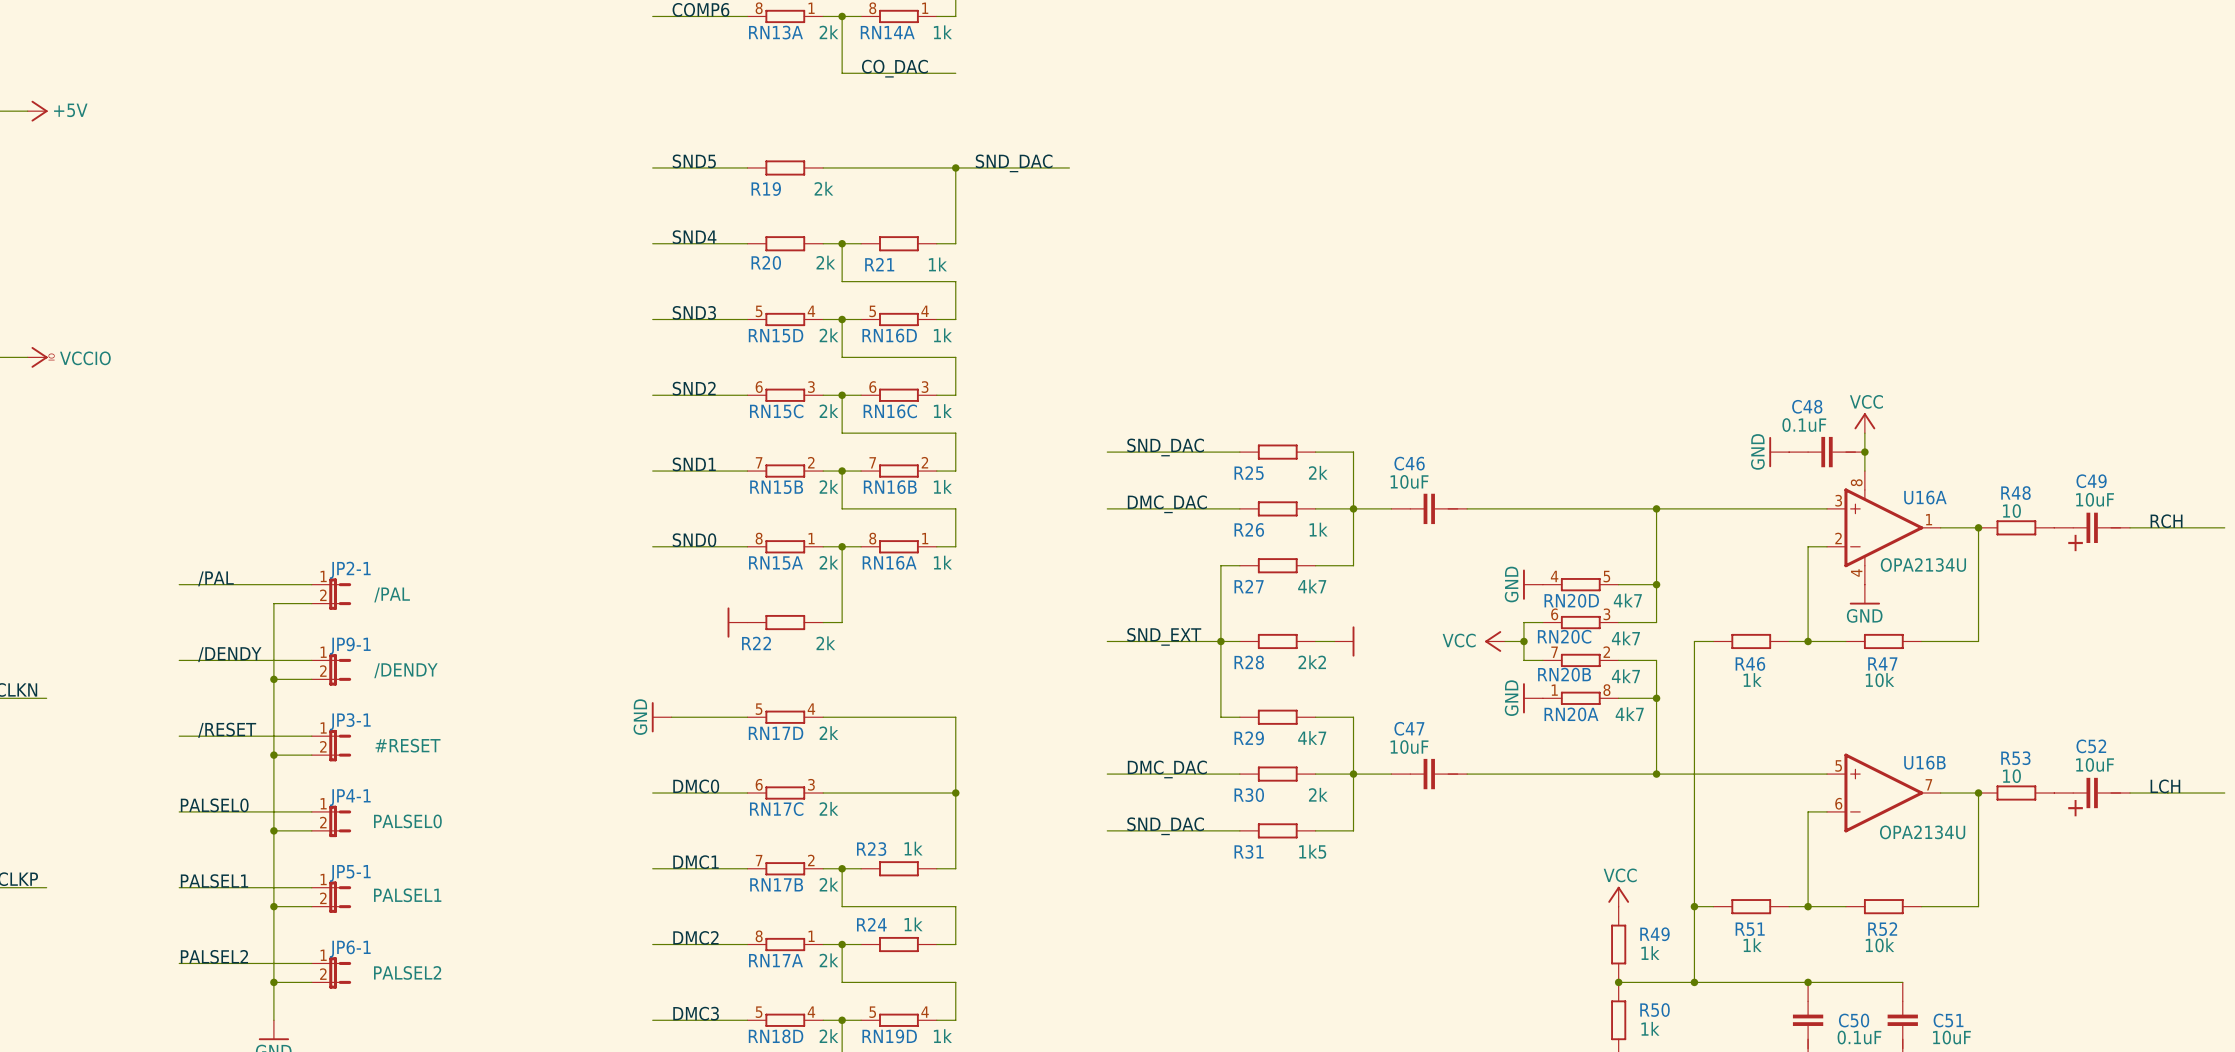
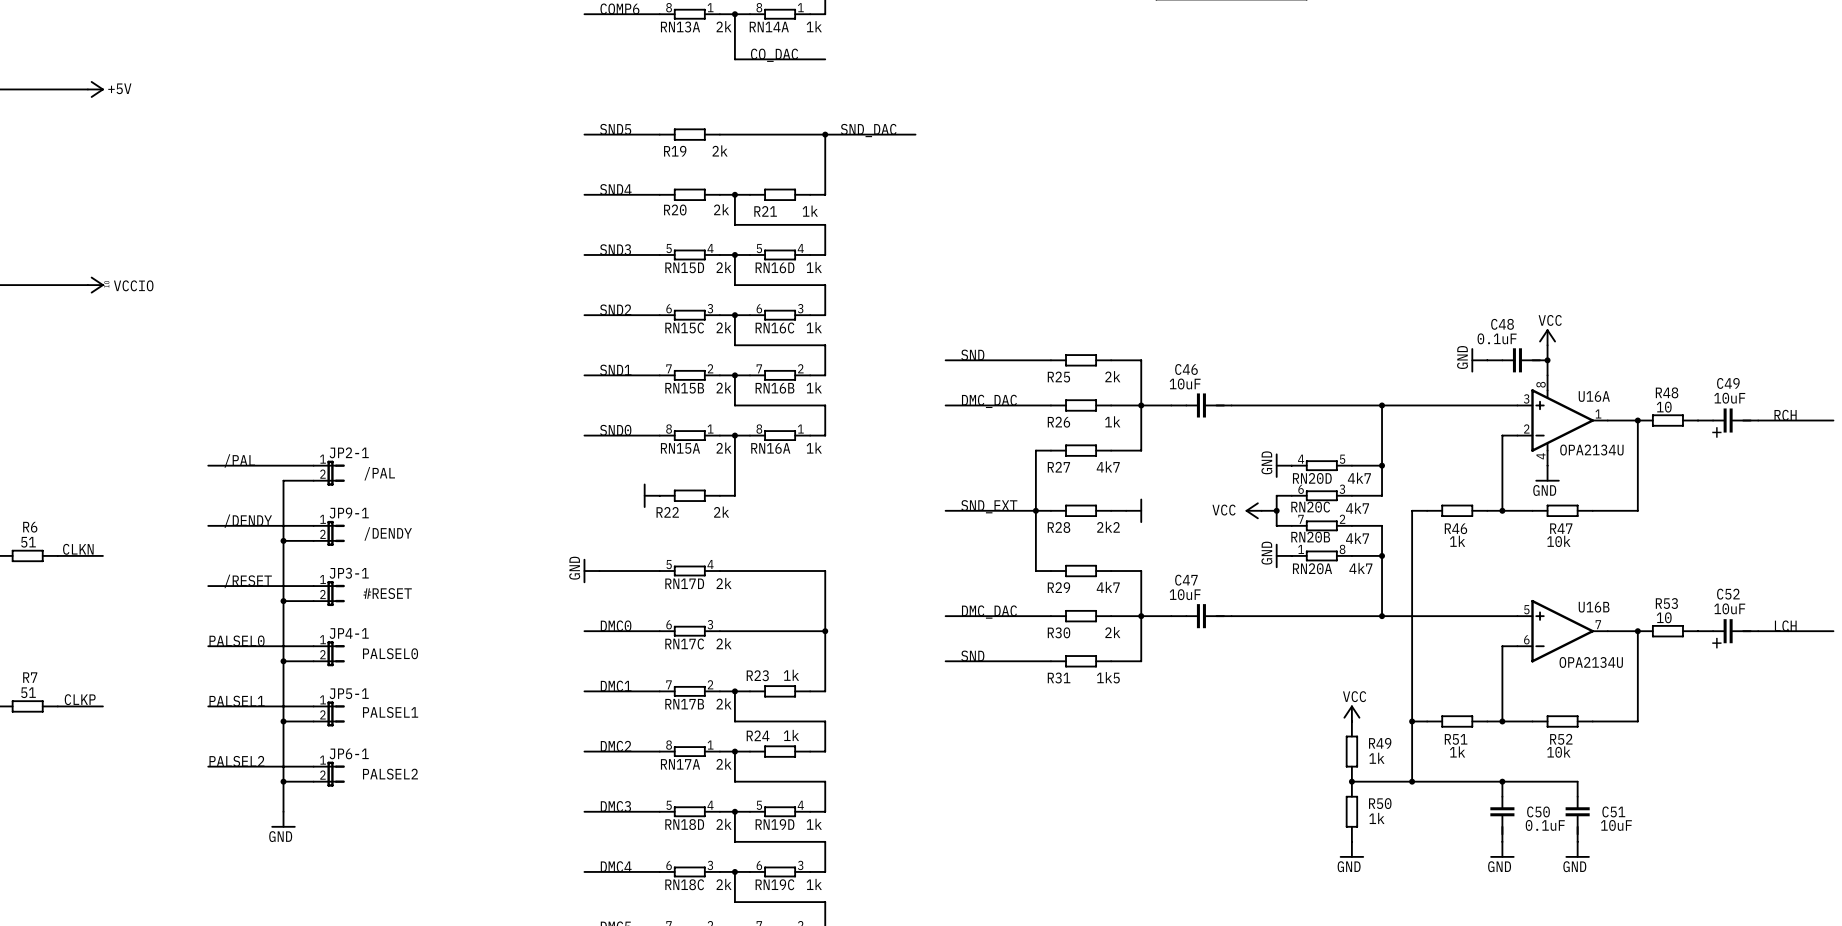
label: SND_DAC (1165, 447) -> SND (972, 355)
label: SND_DAC (1165, 826) -> SND (972, 656)

